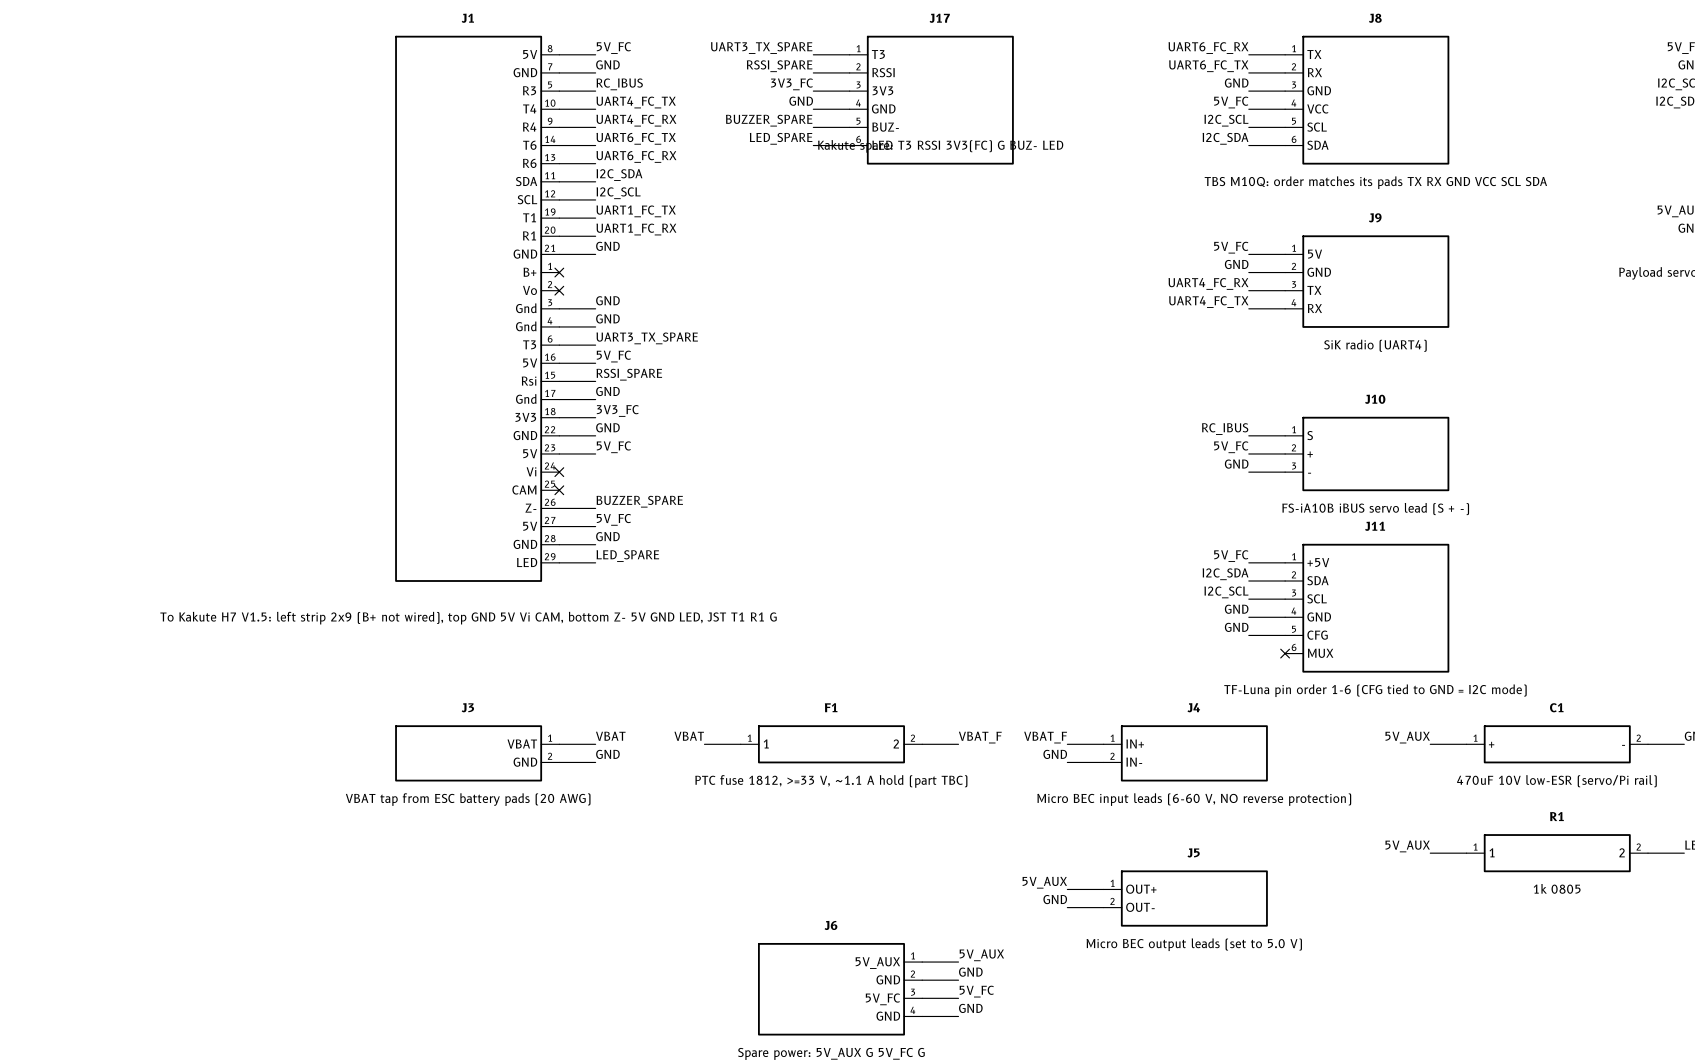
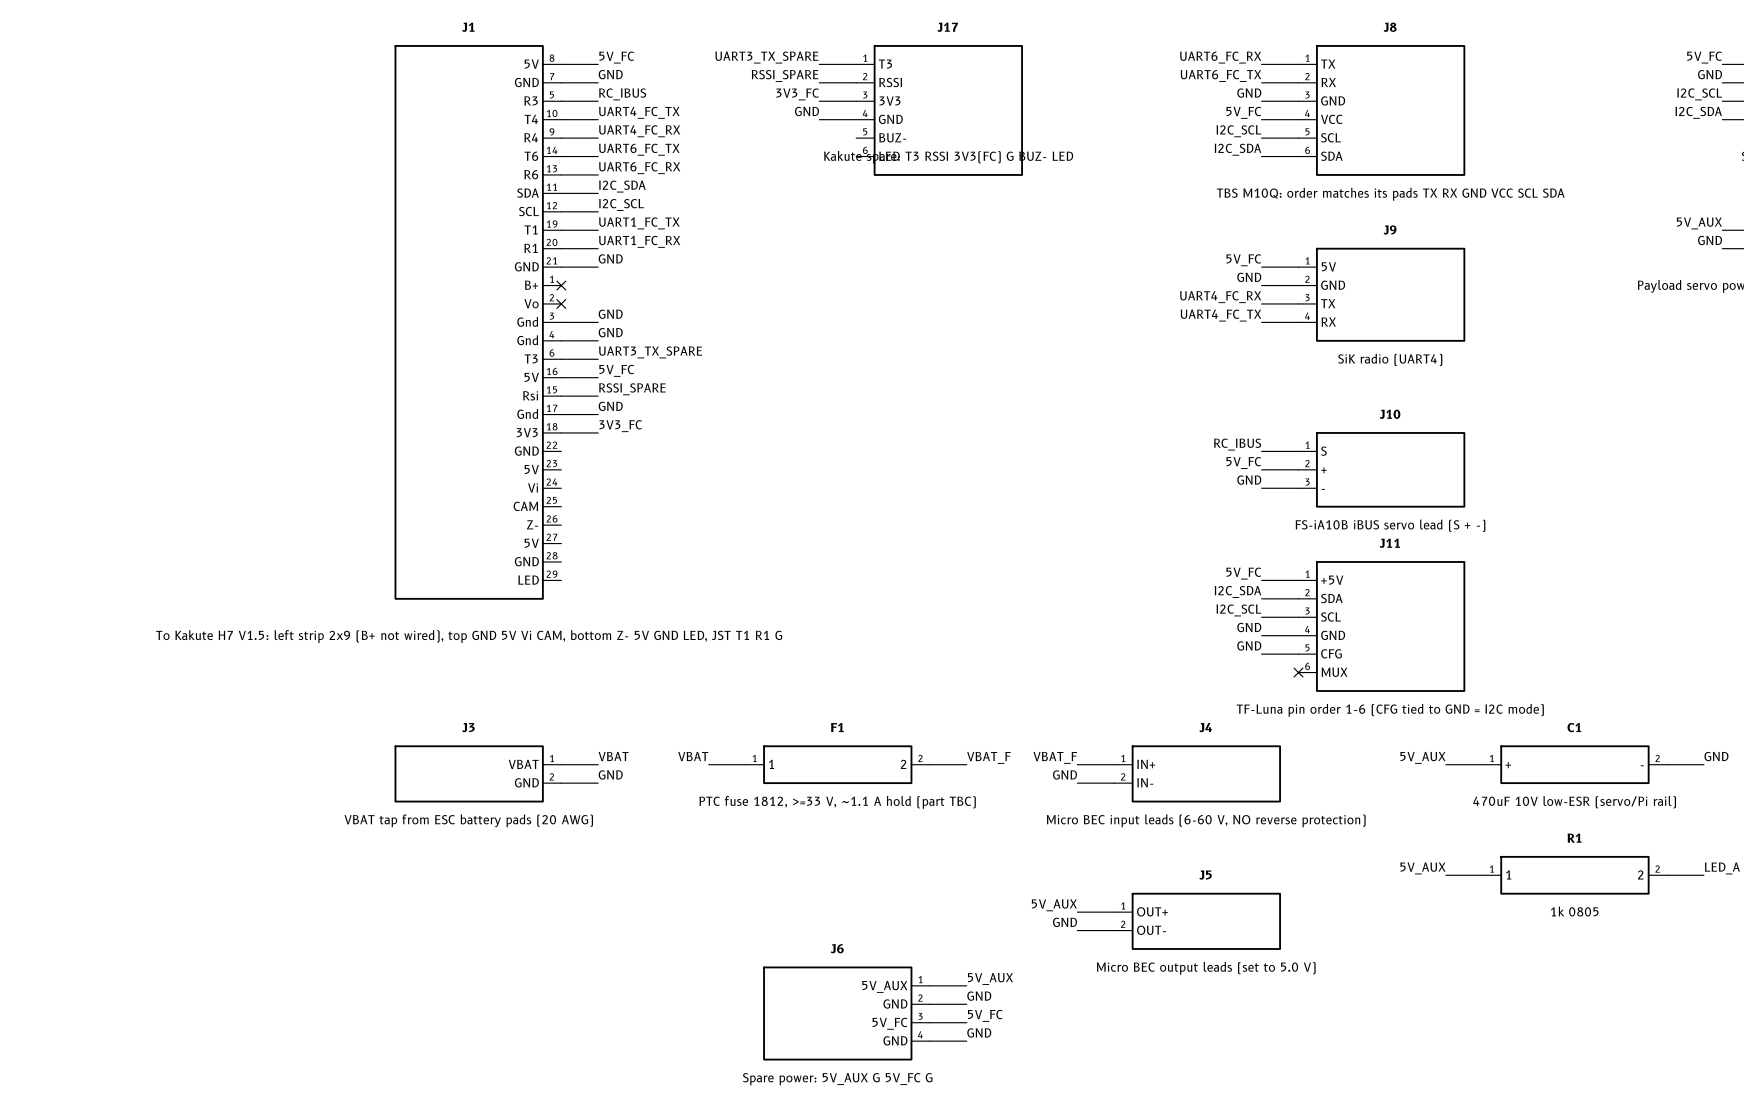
label: BUZZER_SPARE (769, 120) -> none
wire: (813, 127) (849, 127) -> none
label: LED_SPARE (781, 138) -> none
wire: (813, 145) (849, 145) -> none
label: GND (607, 427) -> none
wire: (559, 435) (595, 435) -> none
label: 5V_FC (613, 447) -> none
wire: (559, 453) (595, 453) -> none
no-connect mark: (559, 472) -> none
no-connect mark: (559, 490) -> none
label: BUZZER_SPARE (639, 501) -> none
wire: (559, 508) (595, 508) -> none
label: 5V_FC (613, 519) -> none
wire: (559, 526) (595, 526) -> none
label: GND (607, 536) -> none
wire: (559, 544) (595, 544) -> none
label: LED_SPARE (627, 556) -> none
wire: (559, 562) (595, 562) -> none

